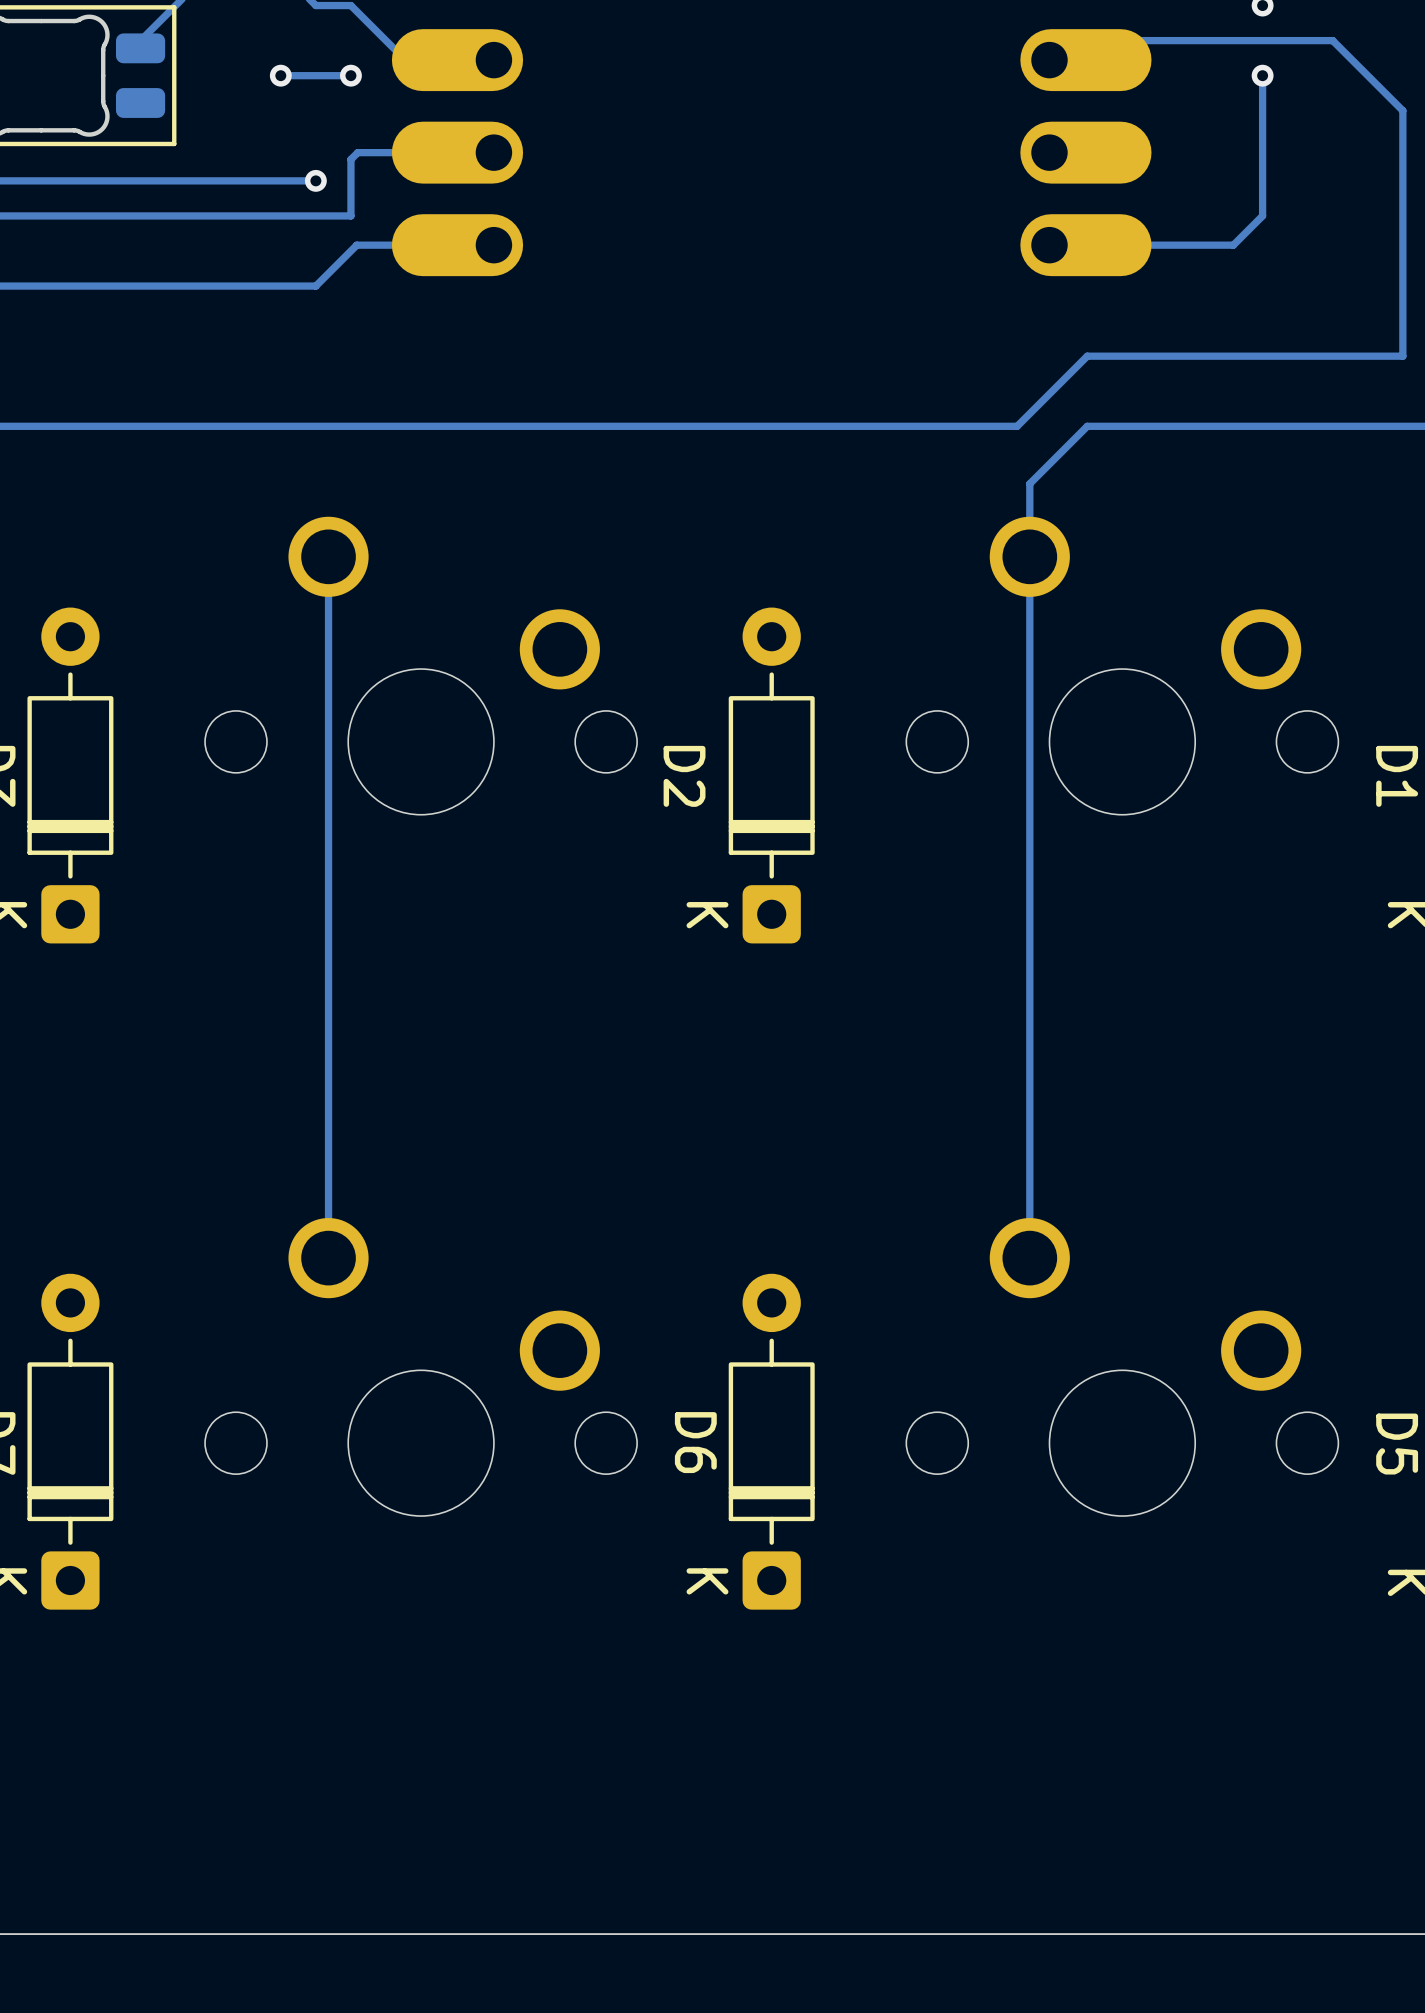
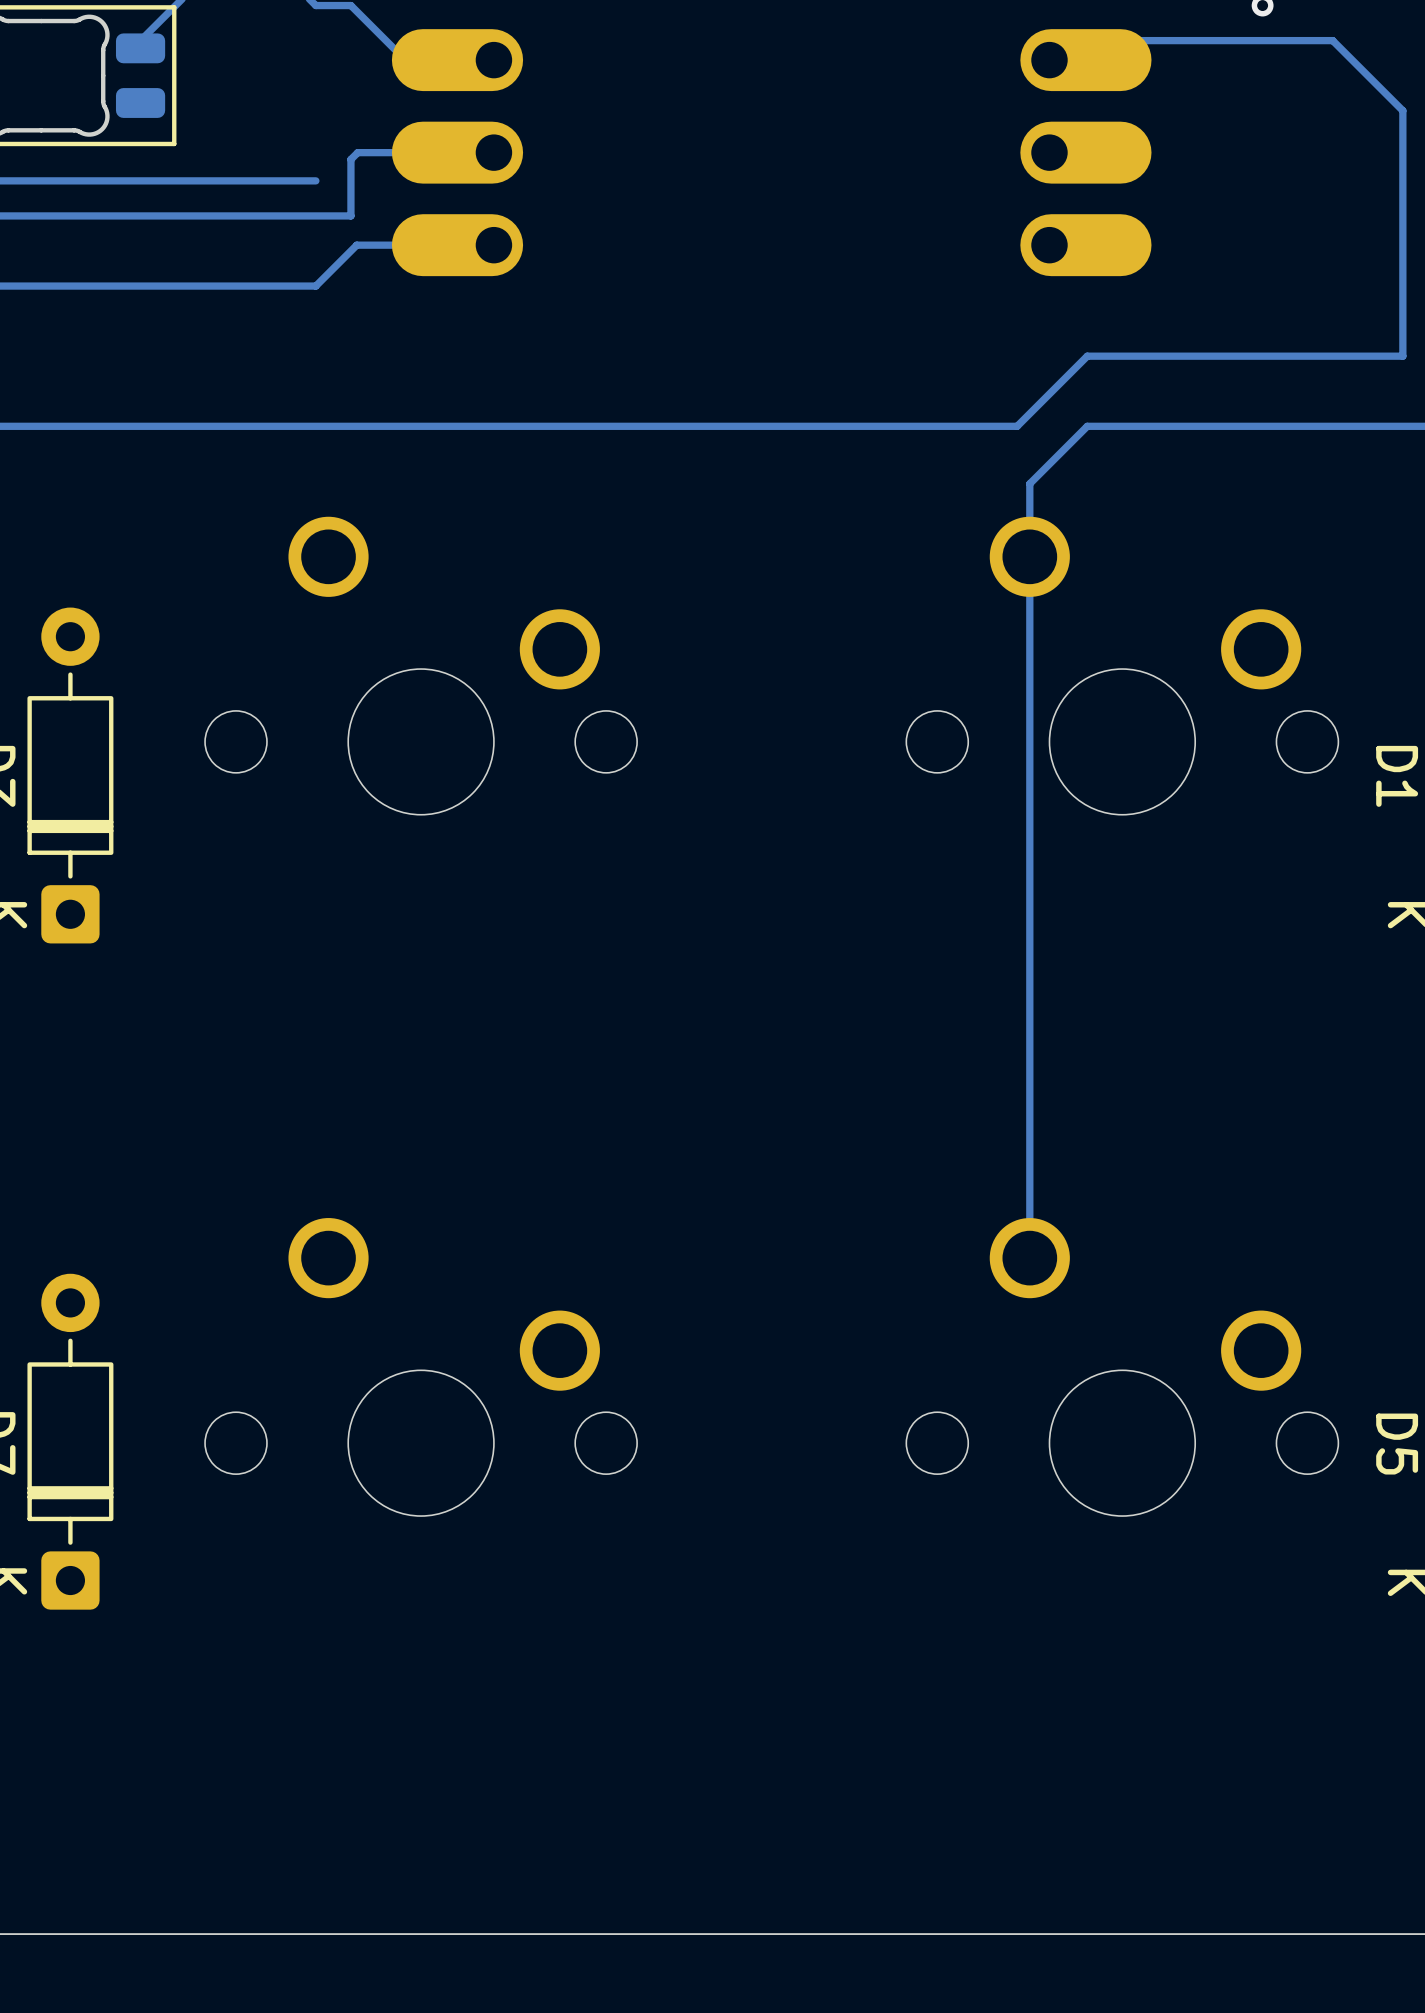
via: (280, 75) -> none
track: (350, 75) (280, 75) -> none
via: (350, 75) -> none
track: (1262, 75) (1262, 215) (1233, 245) (1049, 245) -> none
via: (1262, 75) -> none
via: (315, 180) -> none
track: (328, 556) (328, 1258) -> none
D2: (771, 775) -> none
D6: (771, 1441) -> none

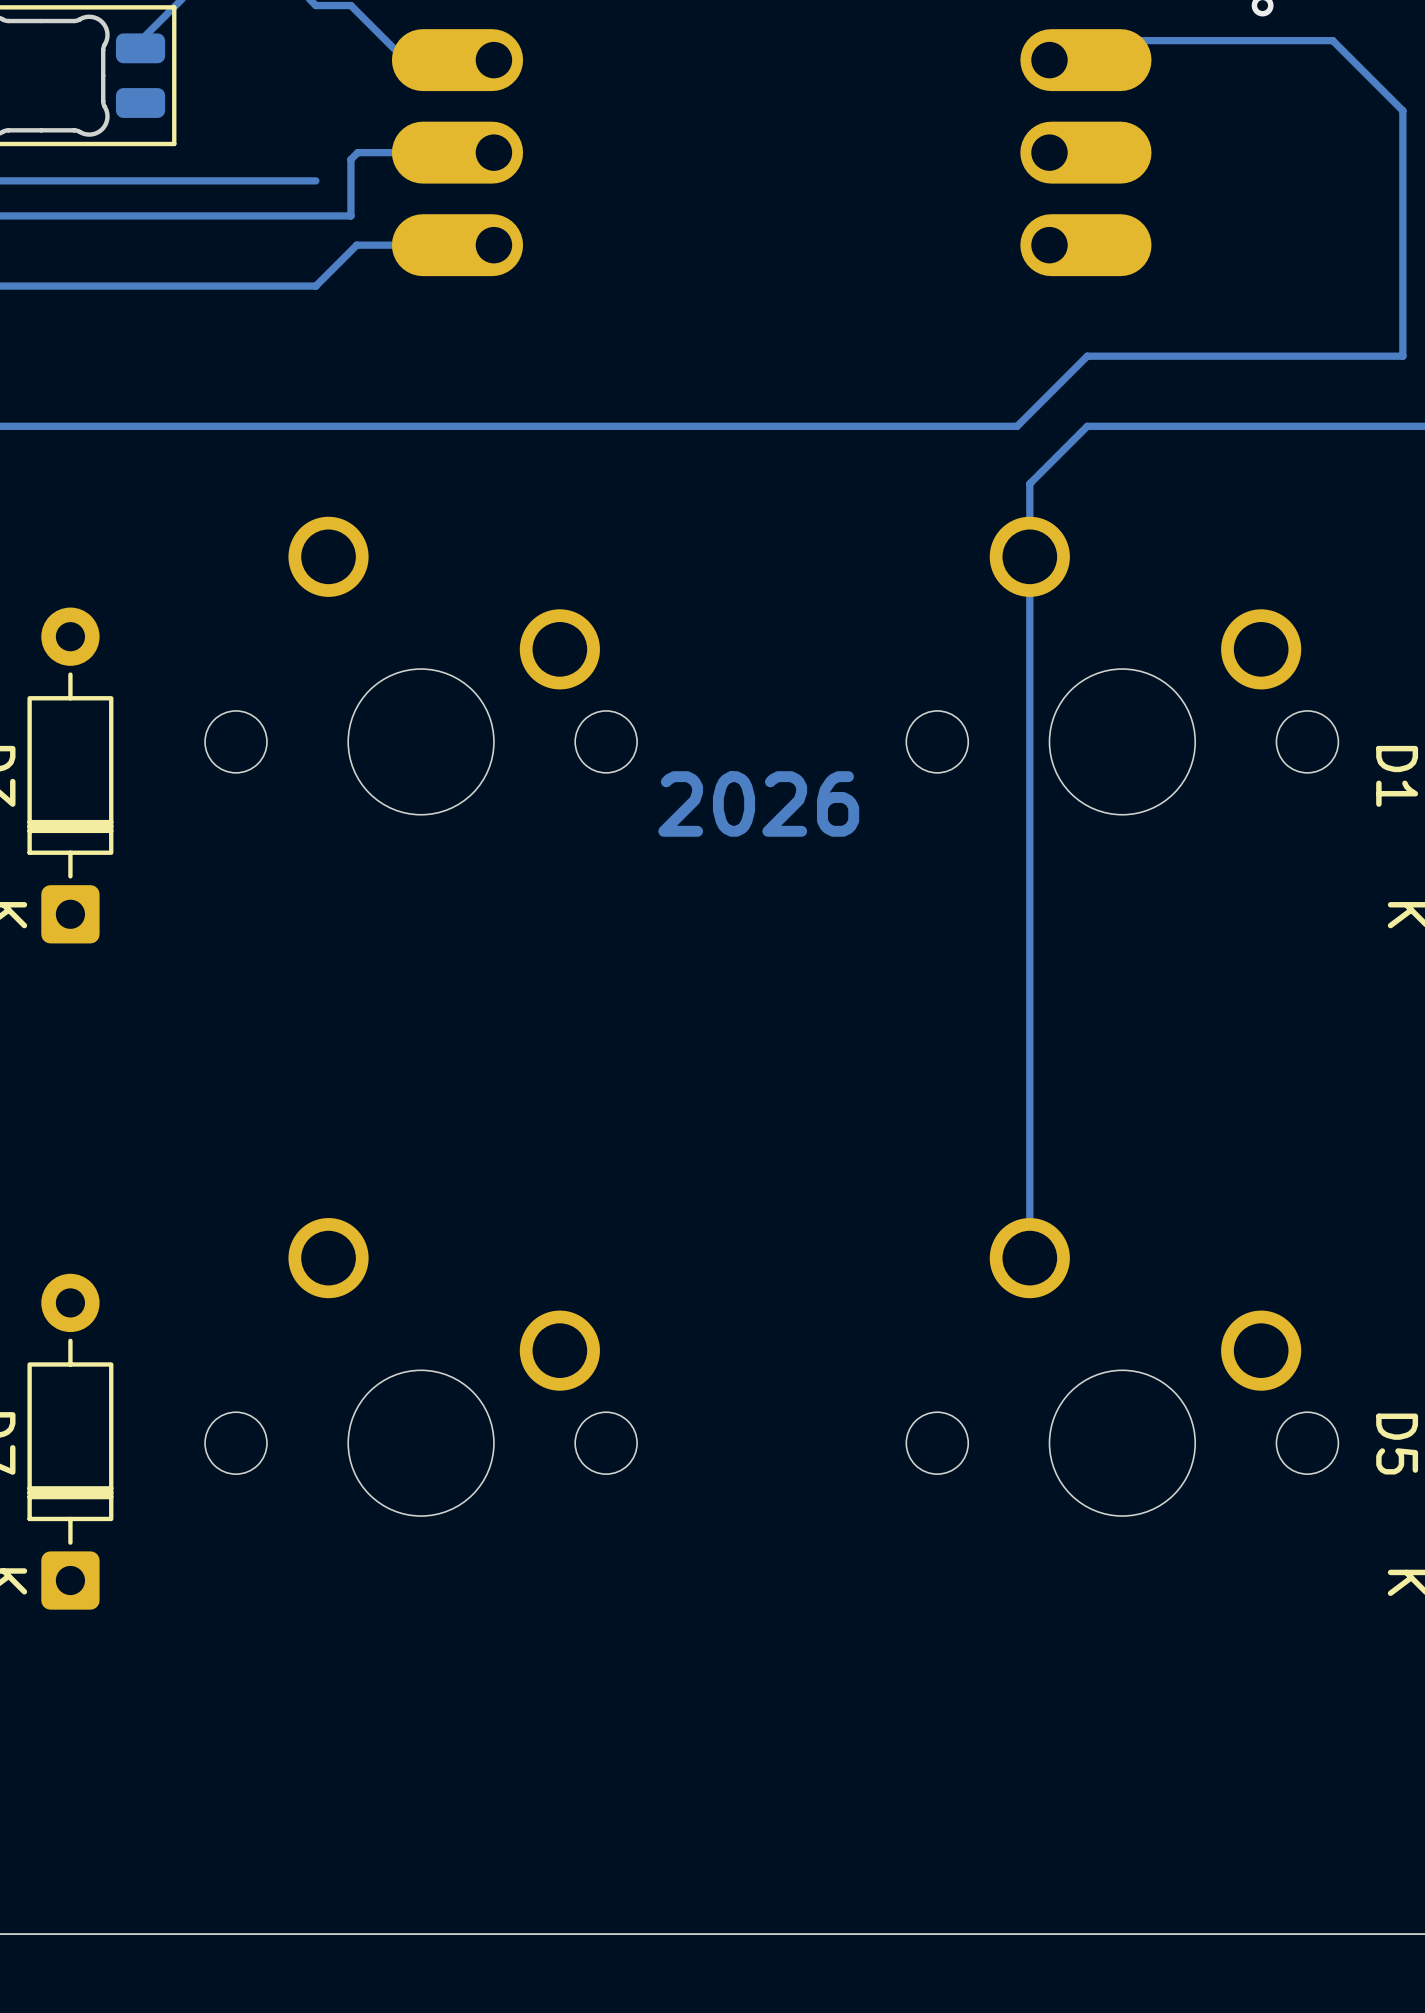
text: none -> 2026 (758, 803)

